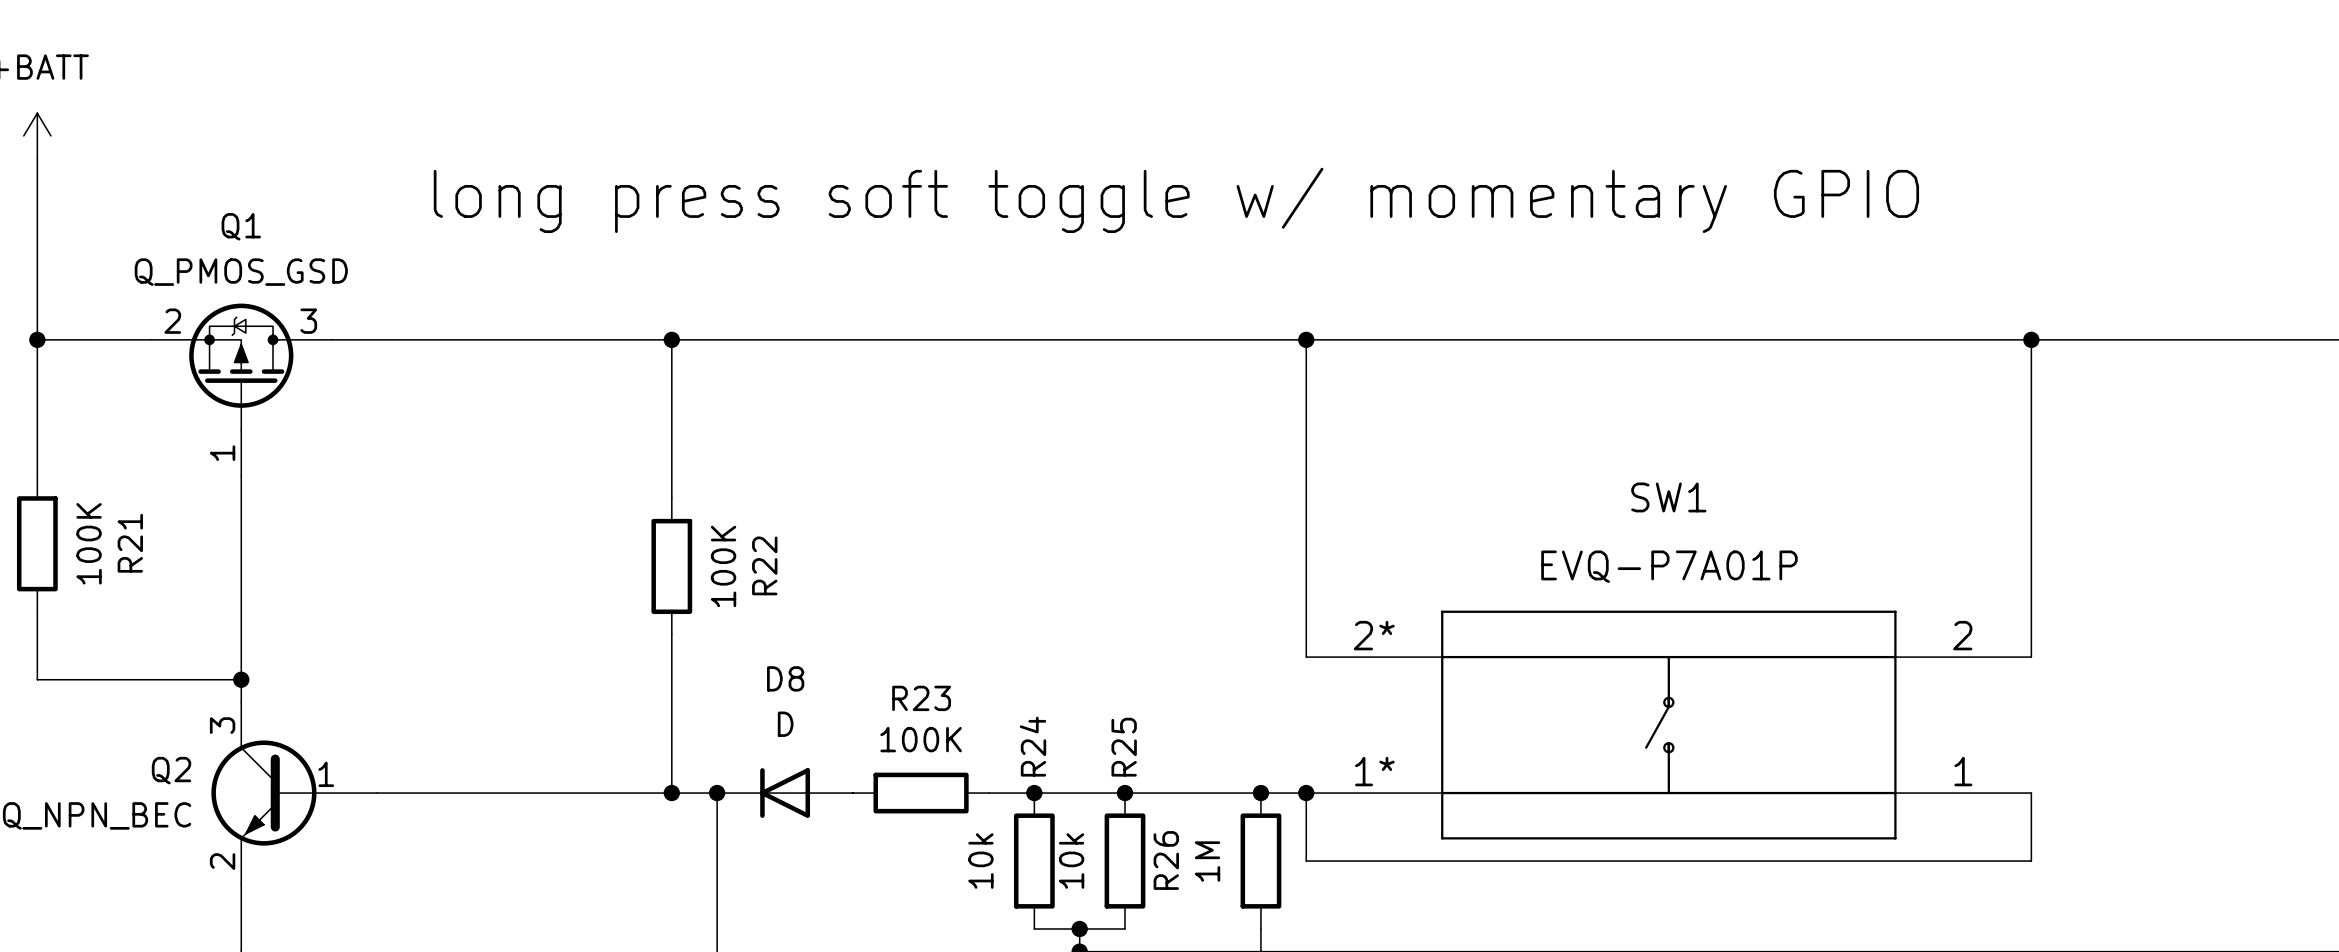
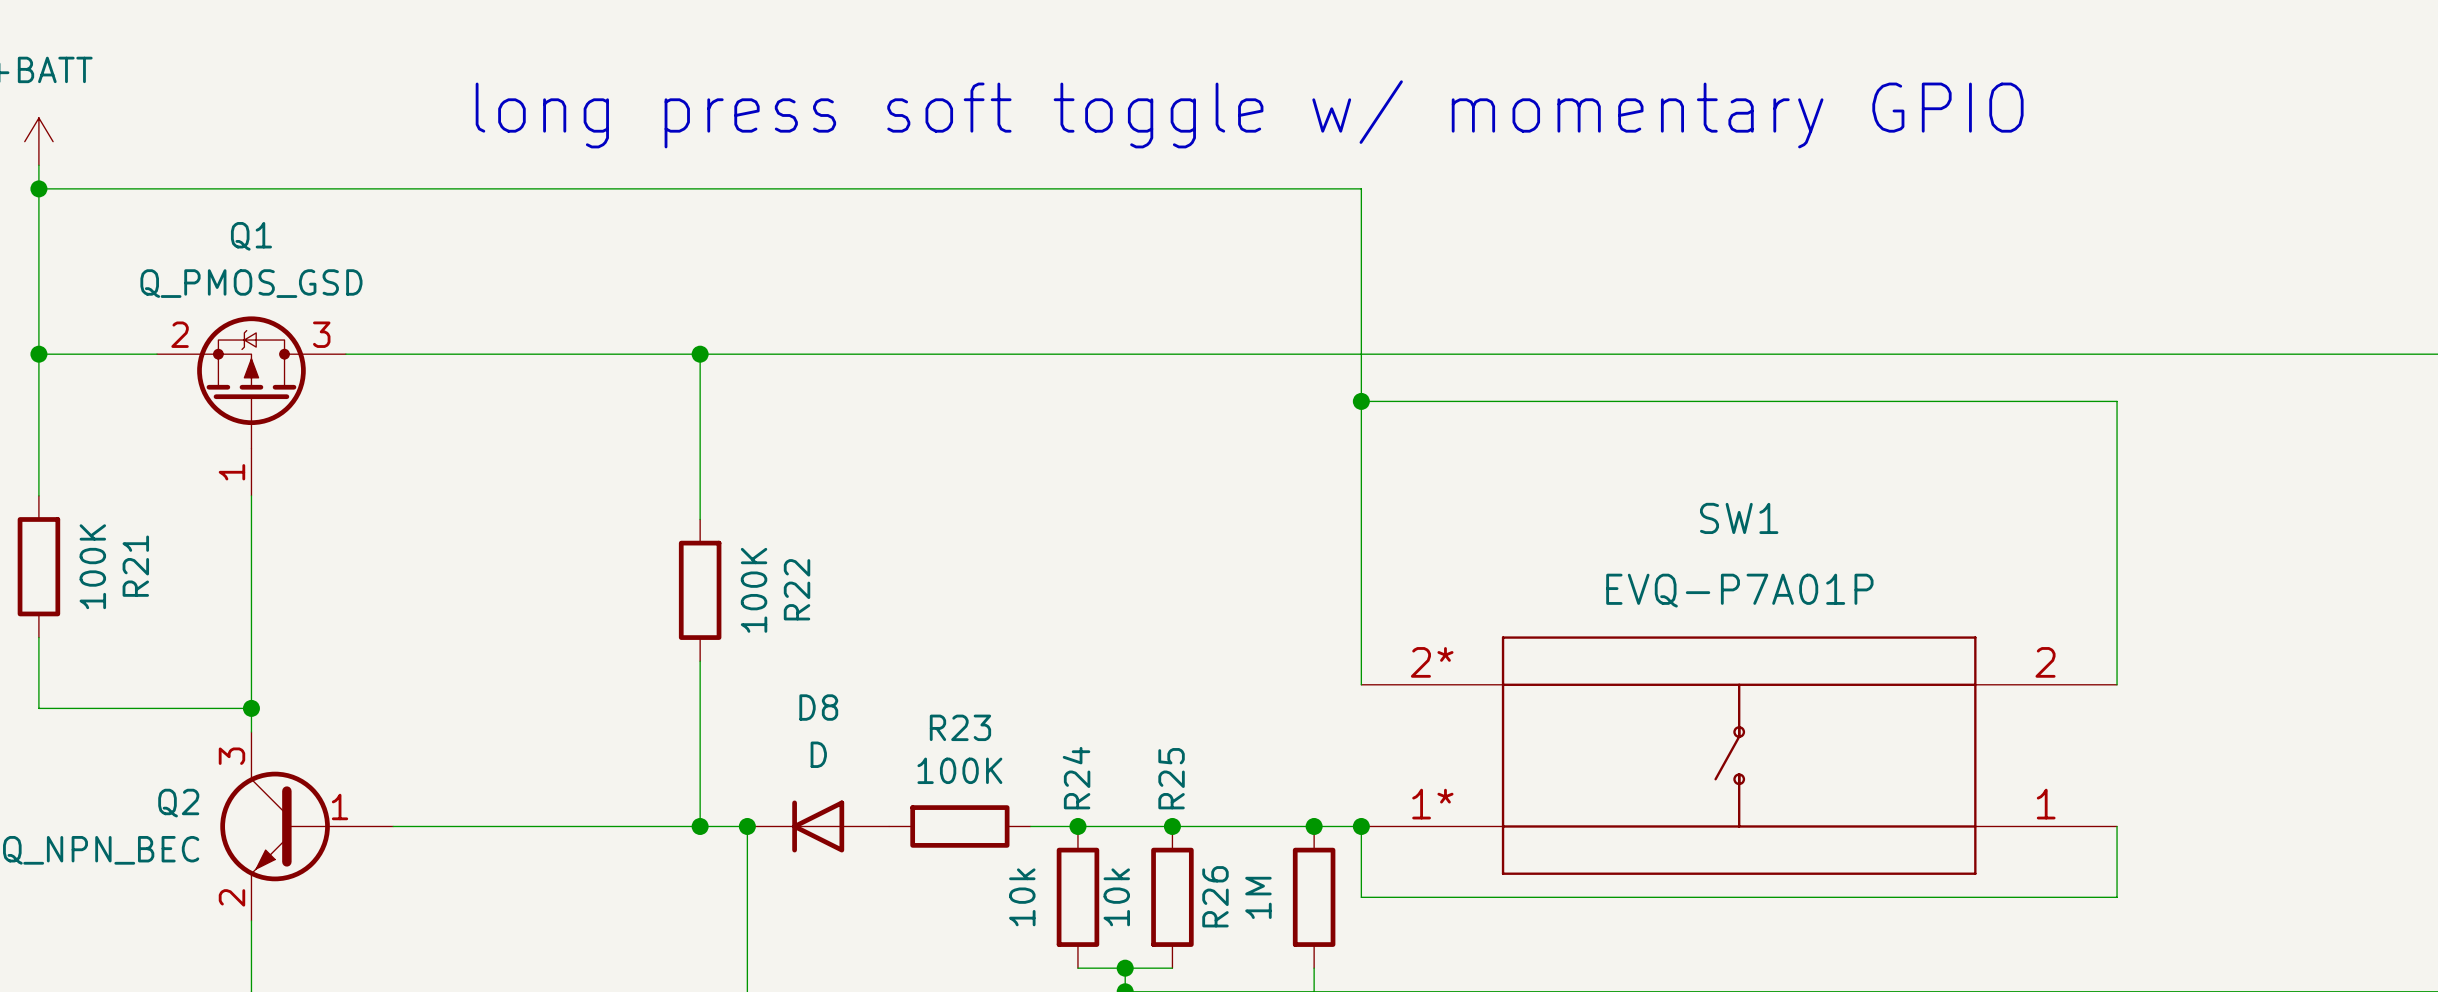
wire: none -> (38, 188) (1361, 188) (1361, 354)
junction: none -> (38, 188)
text position: long press soft toggle w/ momentary GPIO (1176, 200) -> long press soft toggle w/ momentary GPIO (1249, 114)
junction position: (1306, 339) -> (1361, 401)
wire: (2031, 339) (2031, 385) -> (1361, 401) (2117, 401)
junction: (2031, 339) -> none

